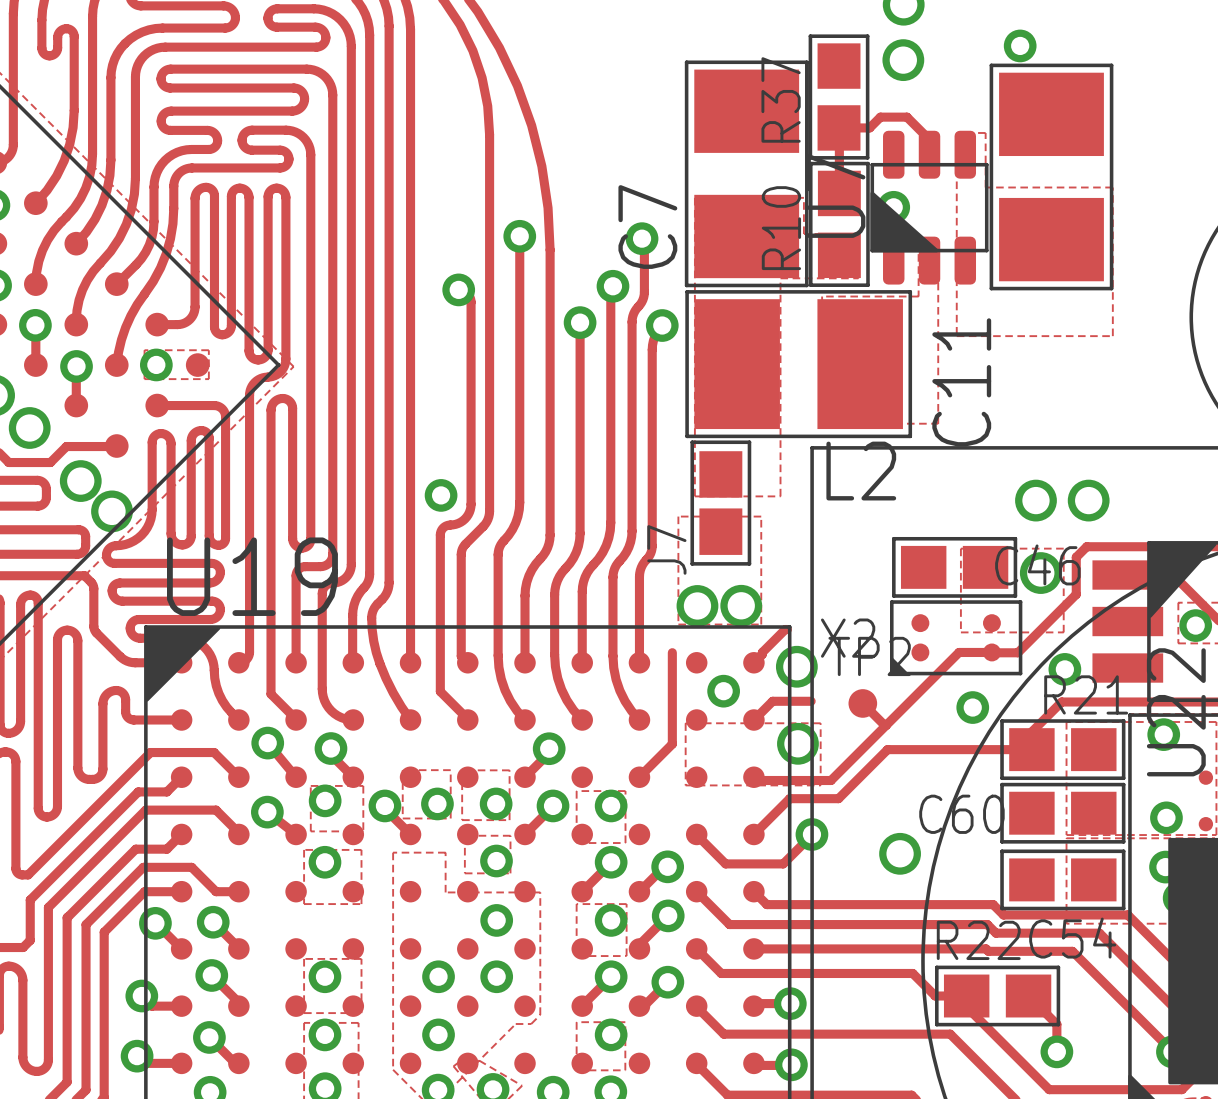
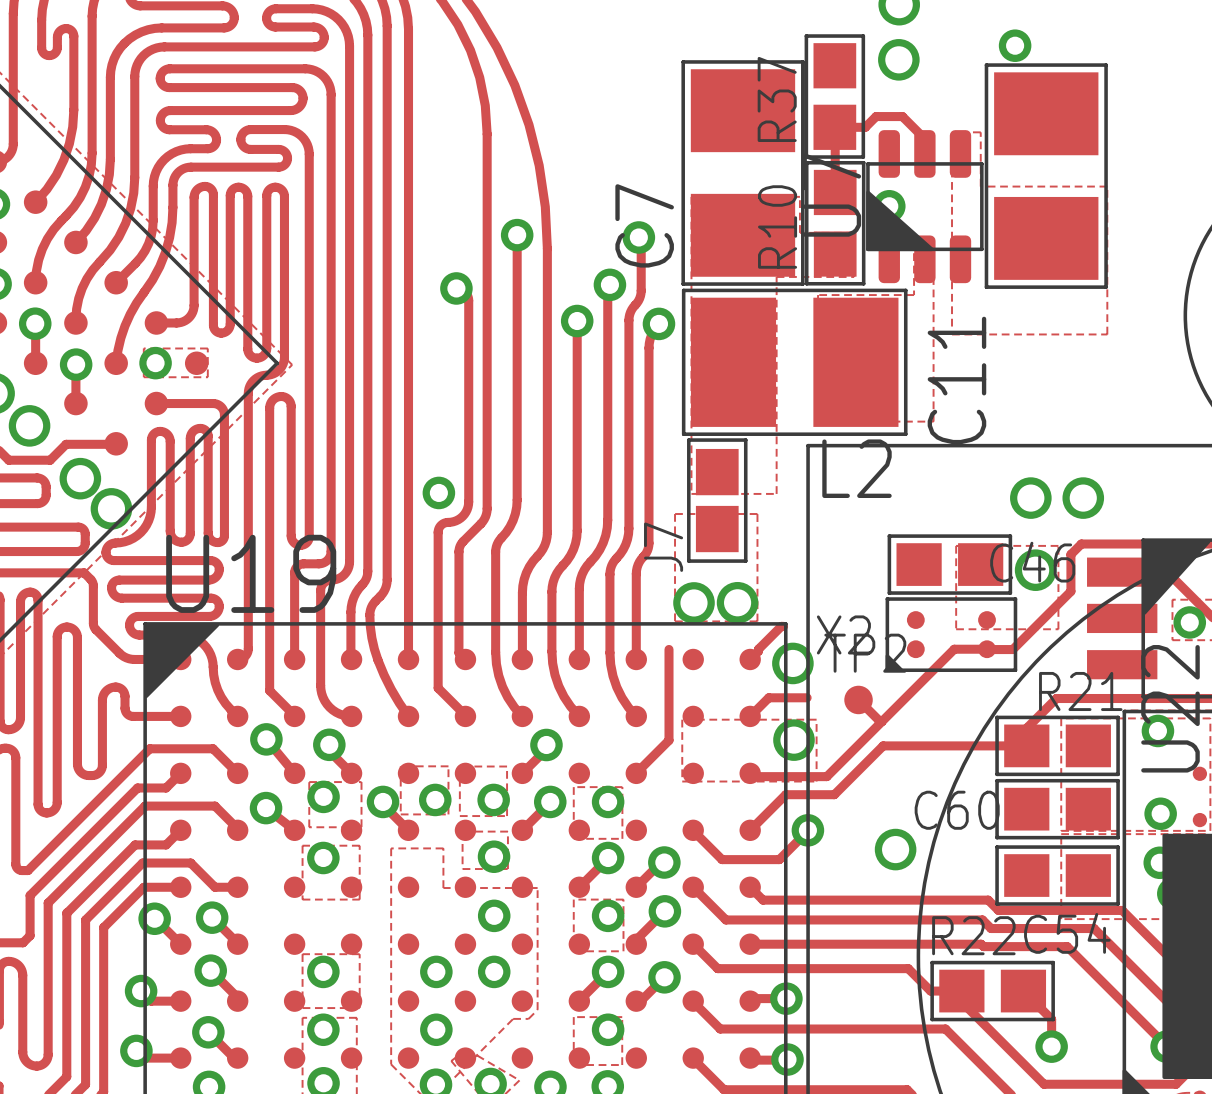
via: (1064, 669) -> none
via: (723, 691) -> none
via: (972, 707) -> none

